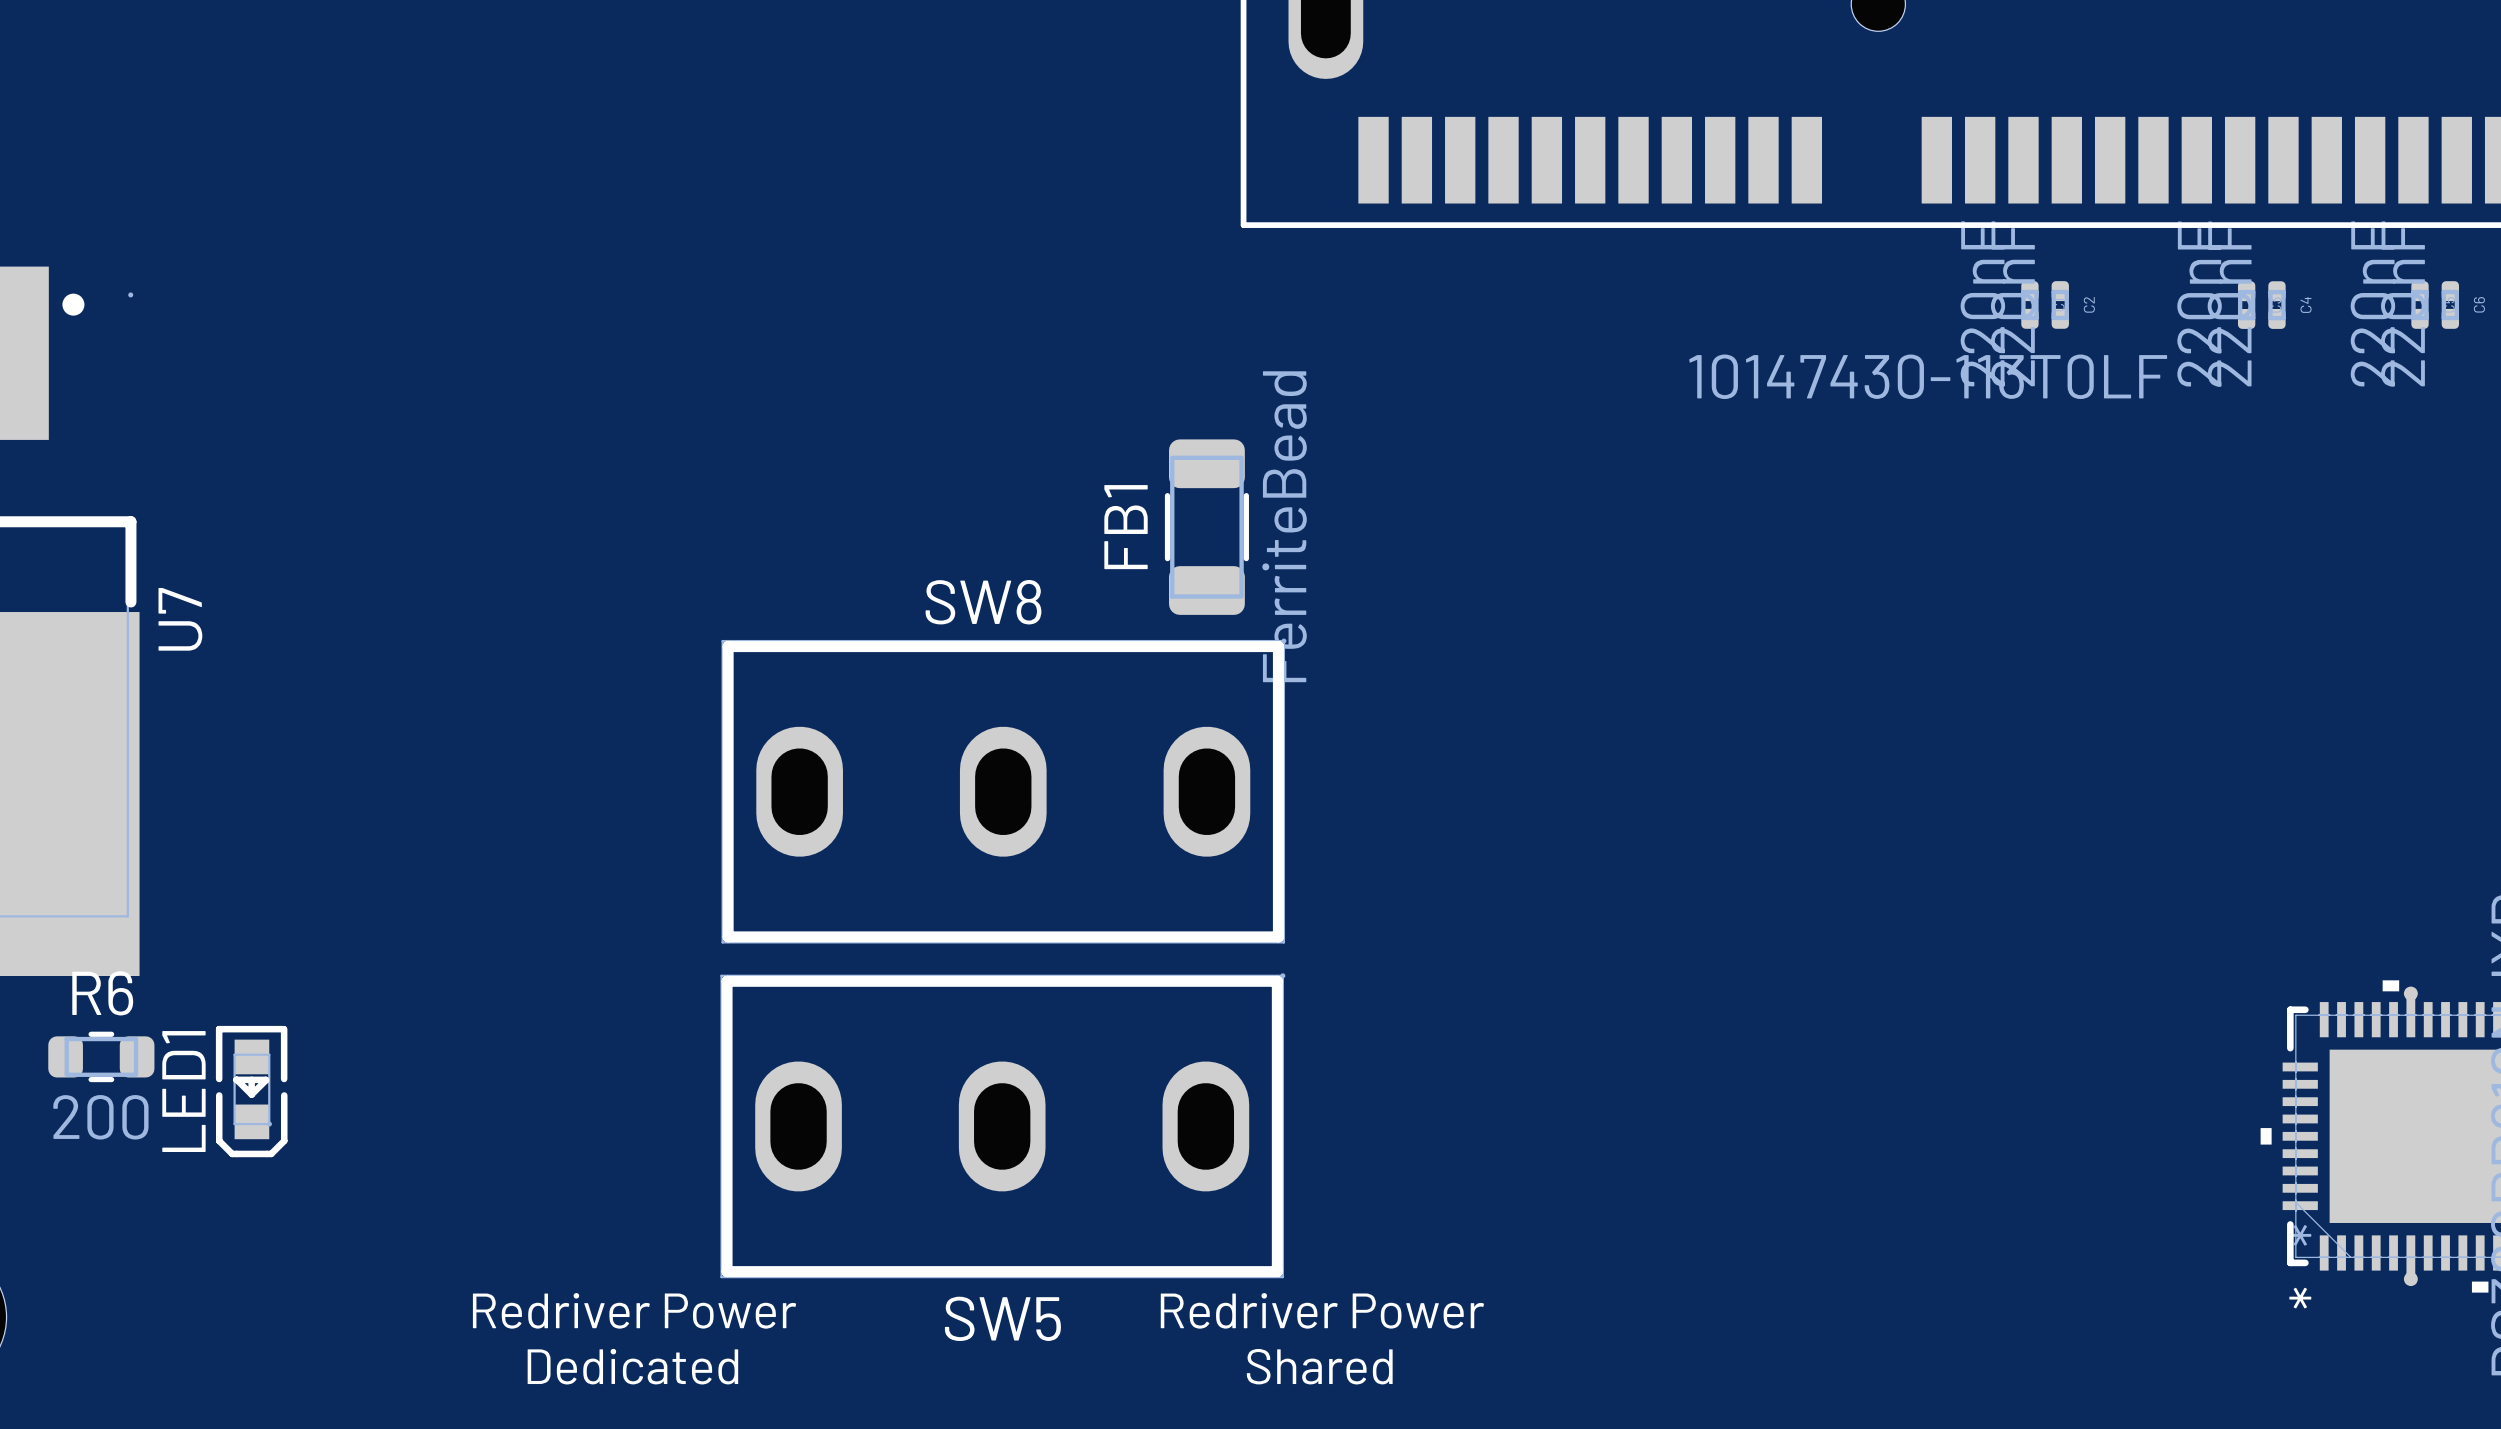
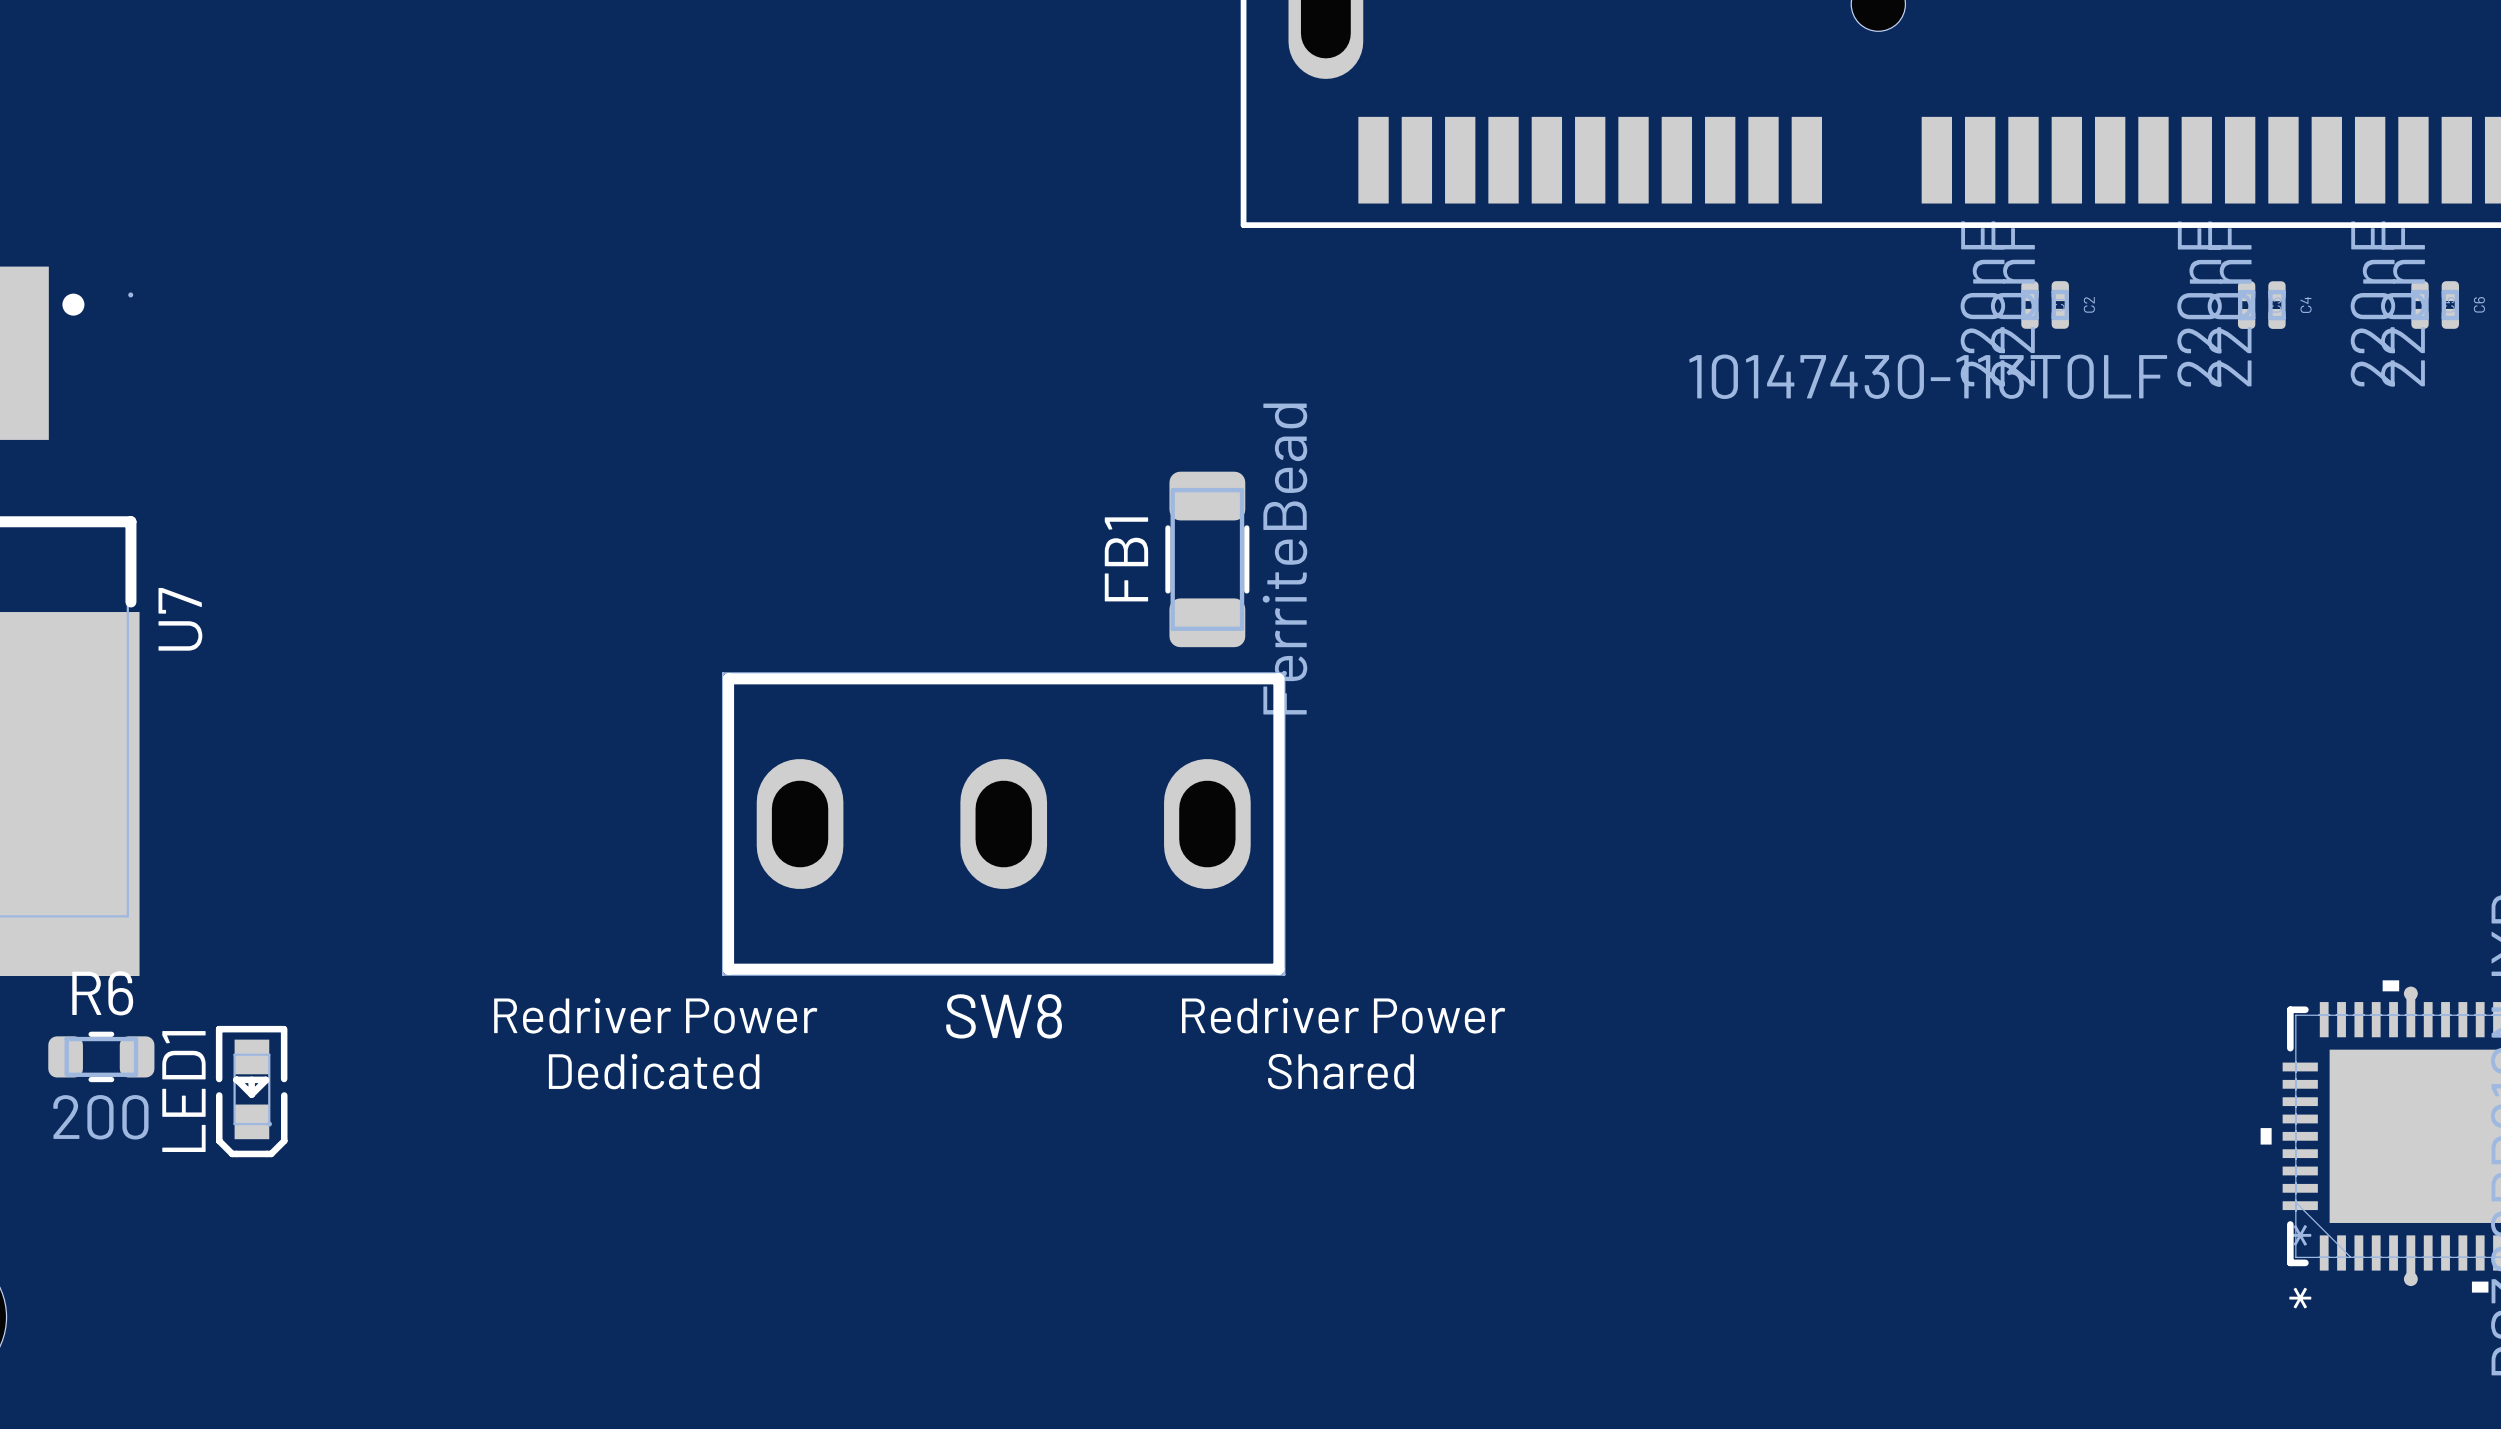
FB1 position: (1206, 527) -> (1207, 559)
SW8 name position: SW8 (983, 602) -> SW8 (1004, 1016)
SW8 position: (1003, 791) -> (1004, 823)
SW5: (1002, 1125) -> none
text position: Redriver Power (634, 1310) -> Redriver Power (655, 1015)
text position: Redriver Power (1322, 1310) -> Redriver Power (1343, 1015)
text position: Dedicated (632, 1366) -> Dedicated (654, 1071)
text position: Shared (1319, 1366) -> Shared (1340, 1071)

